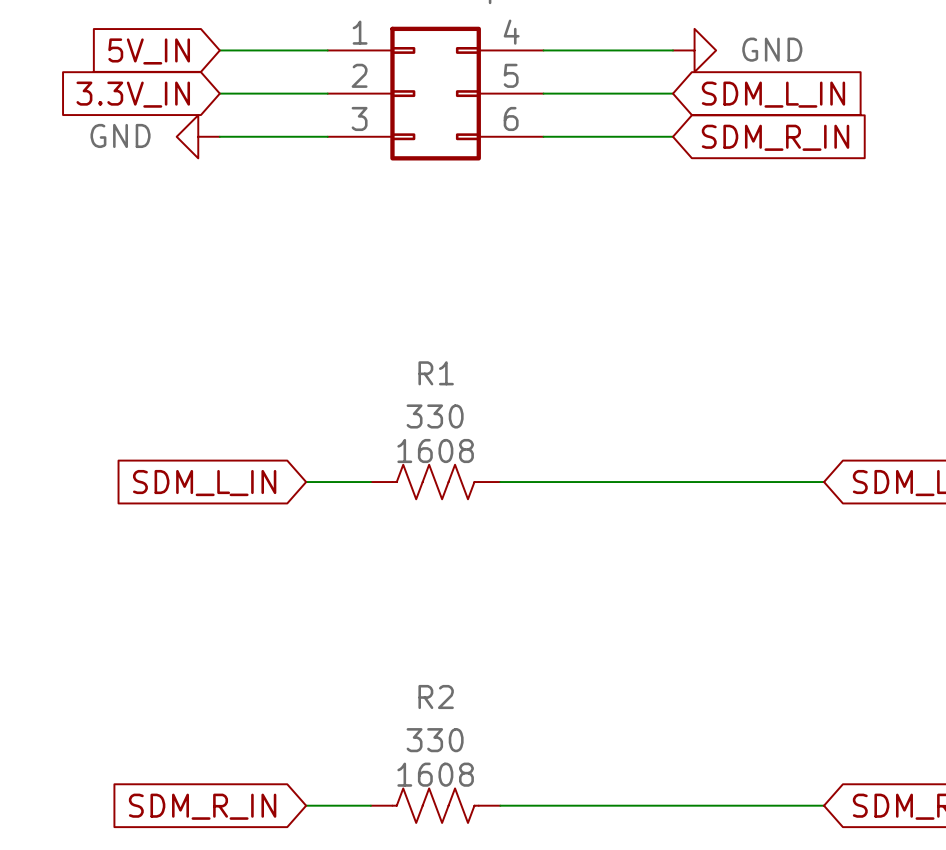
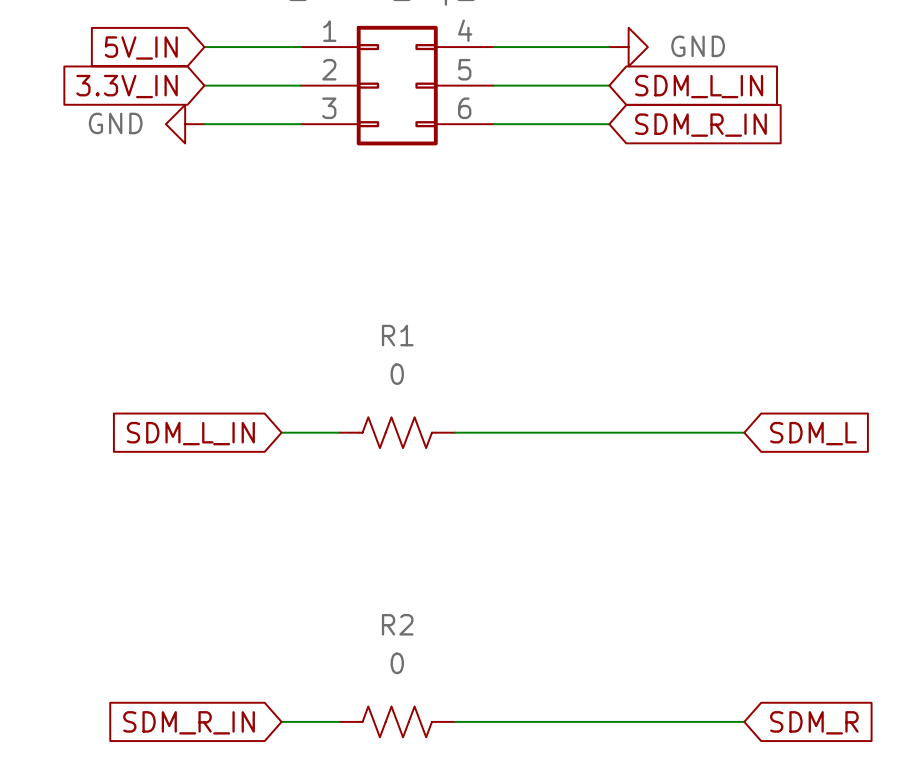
R1 value: 330 (435, 416) -> 0 (397, 374)
R1 text: 1608 (435, 451) -> none
R2 value: 330 (435, 740) -> 0 (397, 663)
R2 text: 1608 (435, 774) -> none

